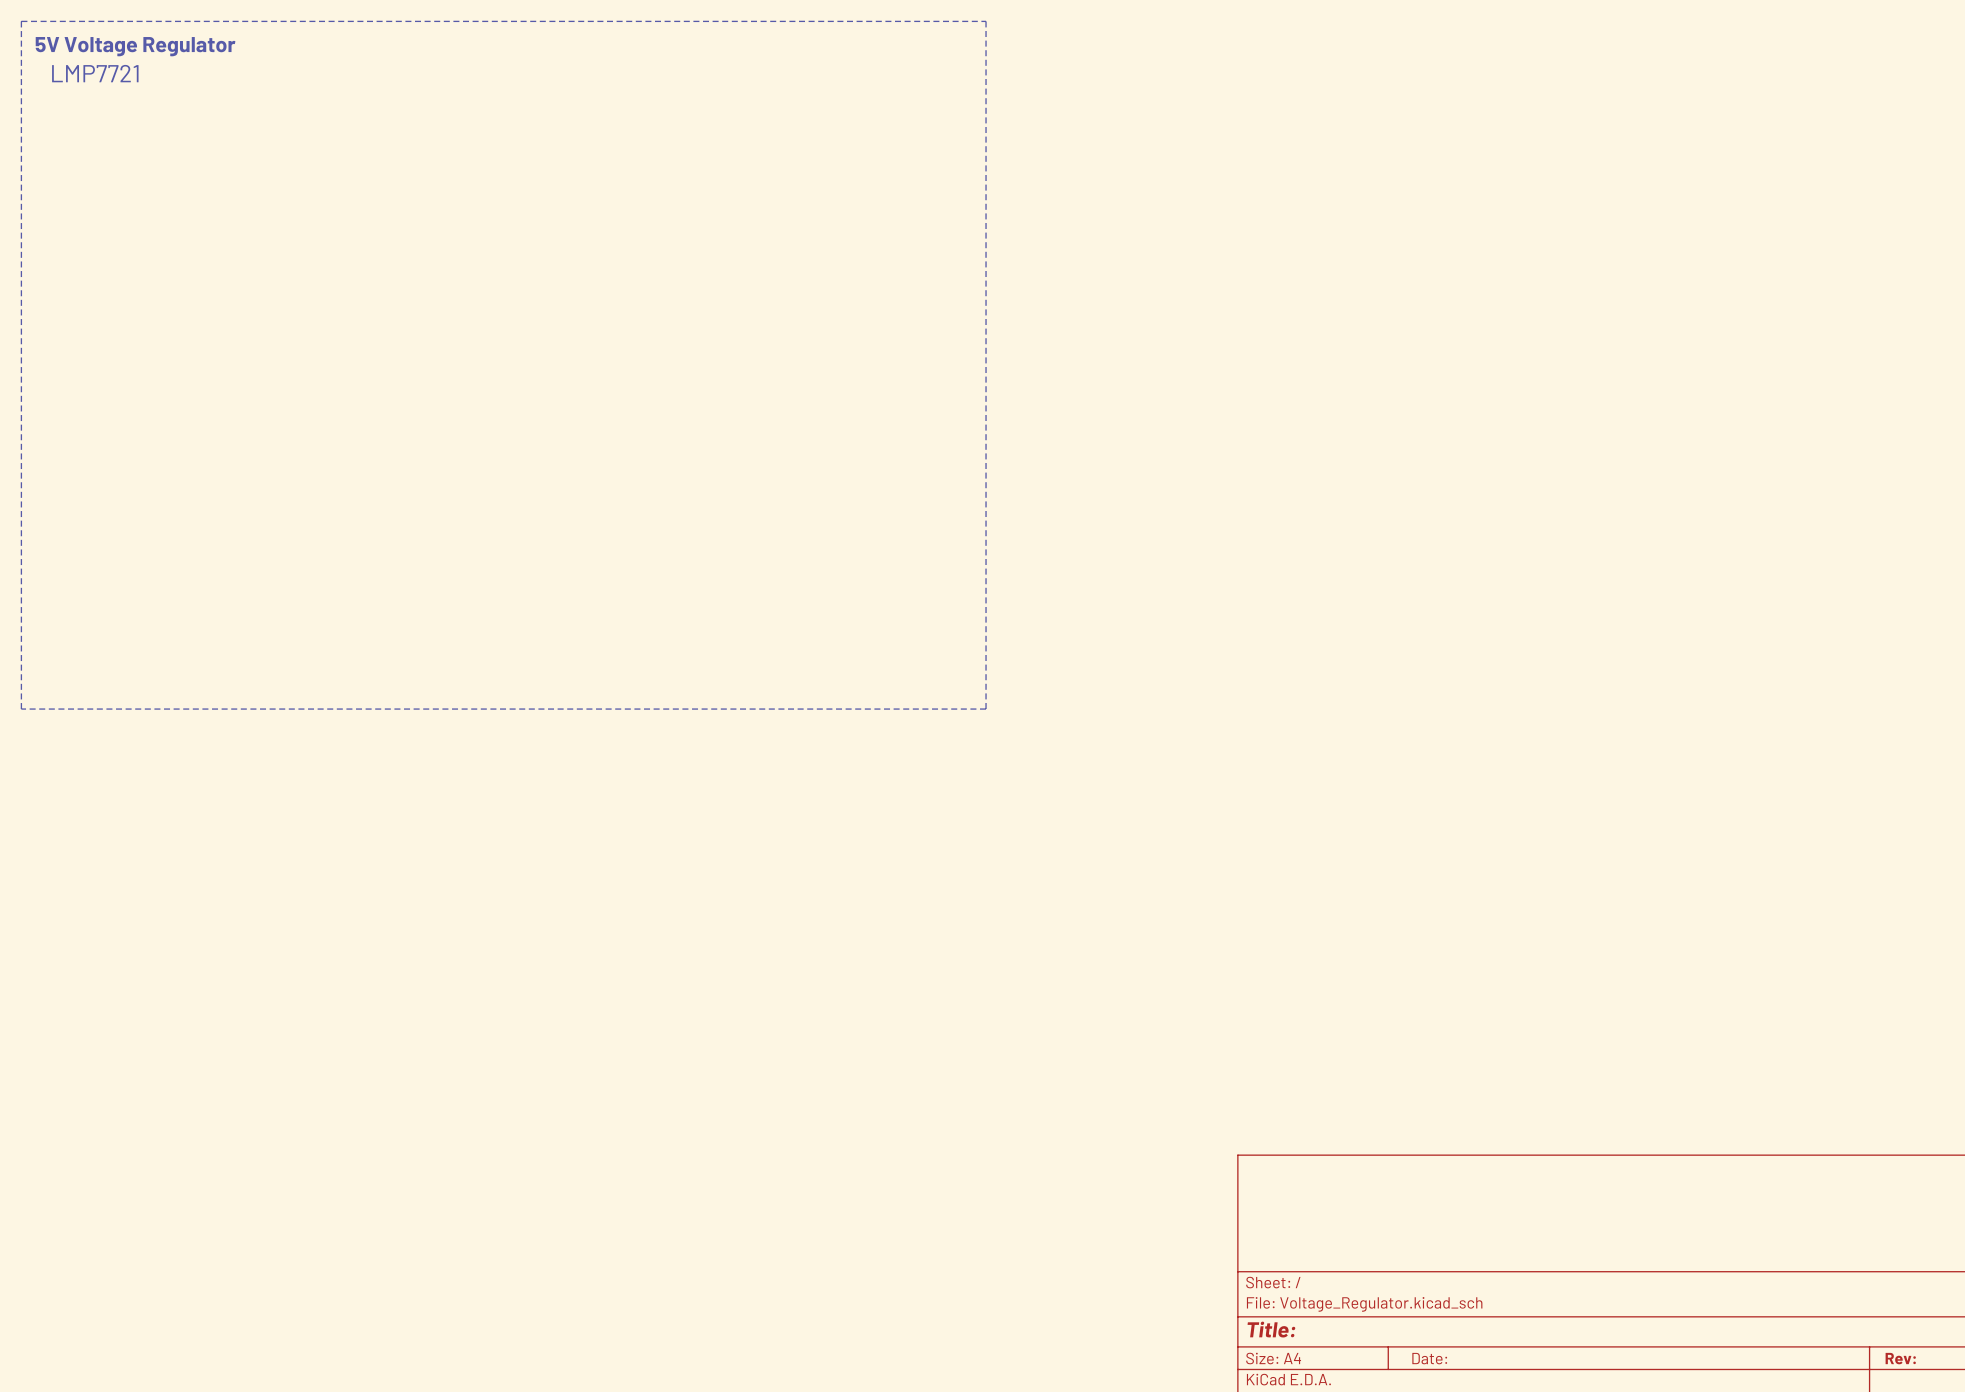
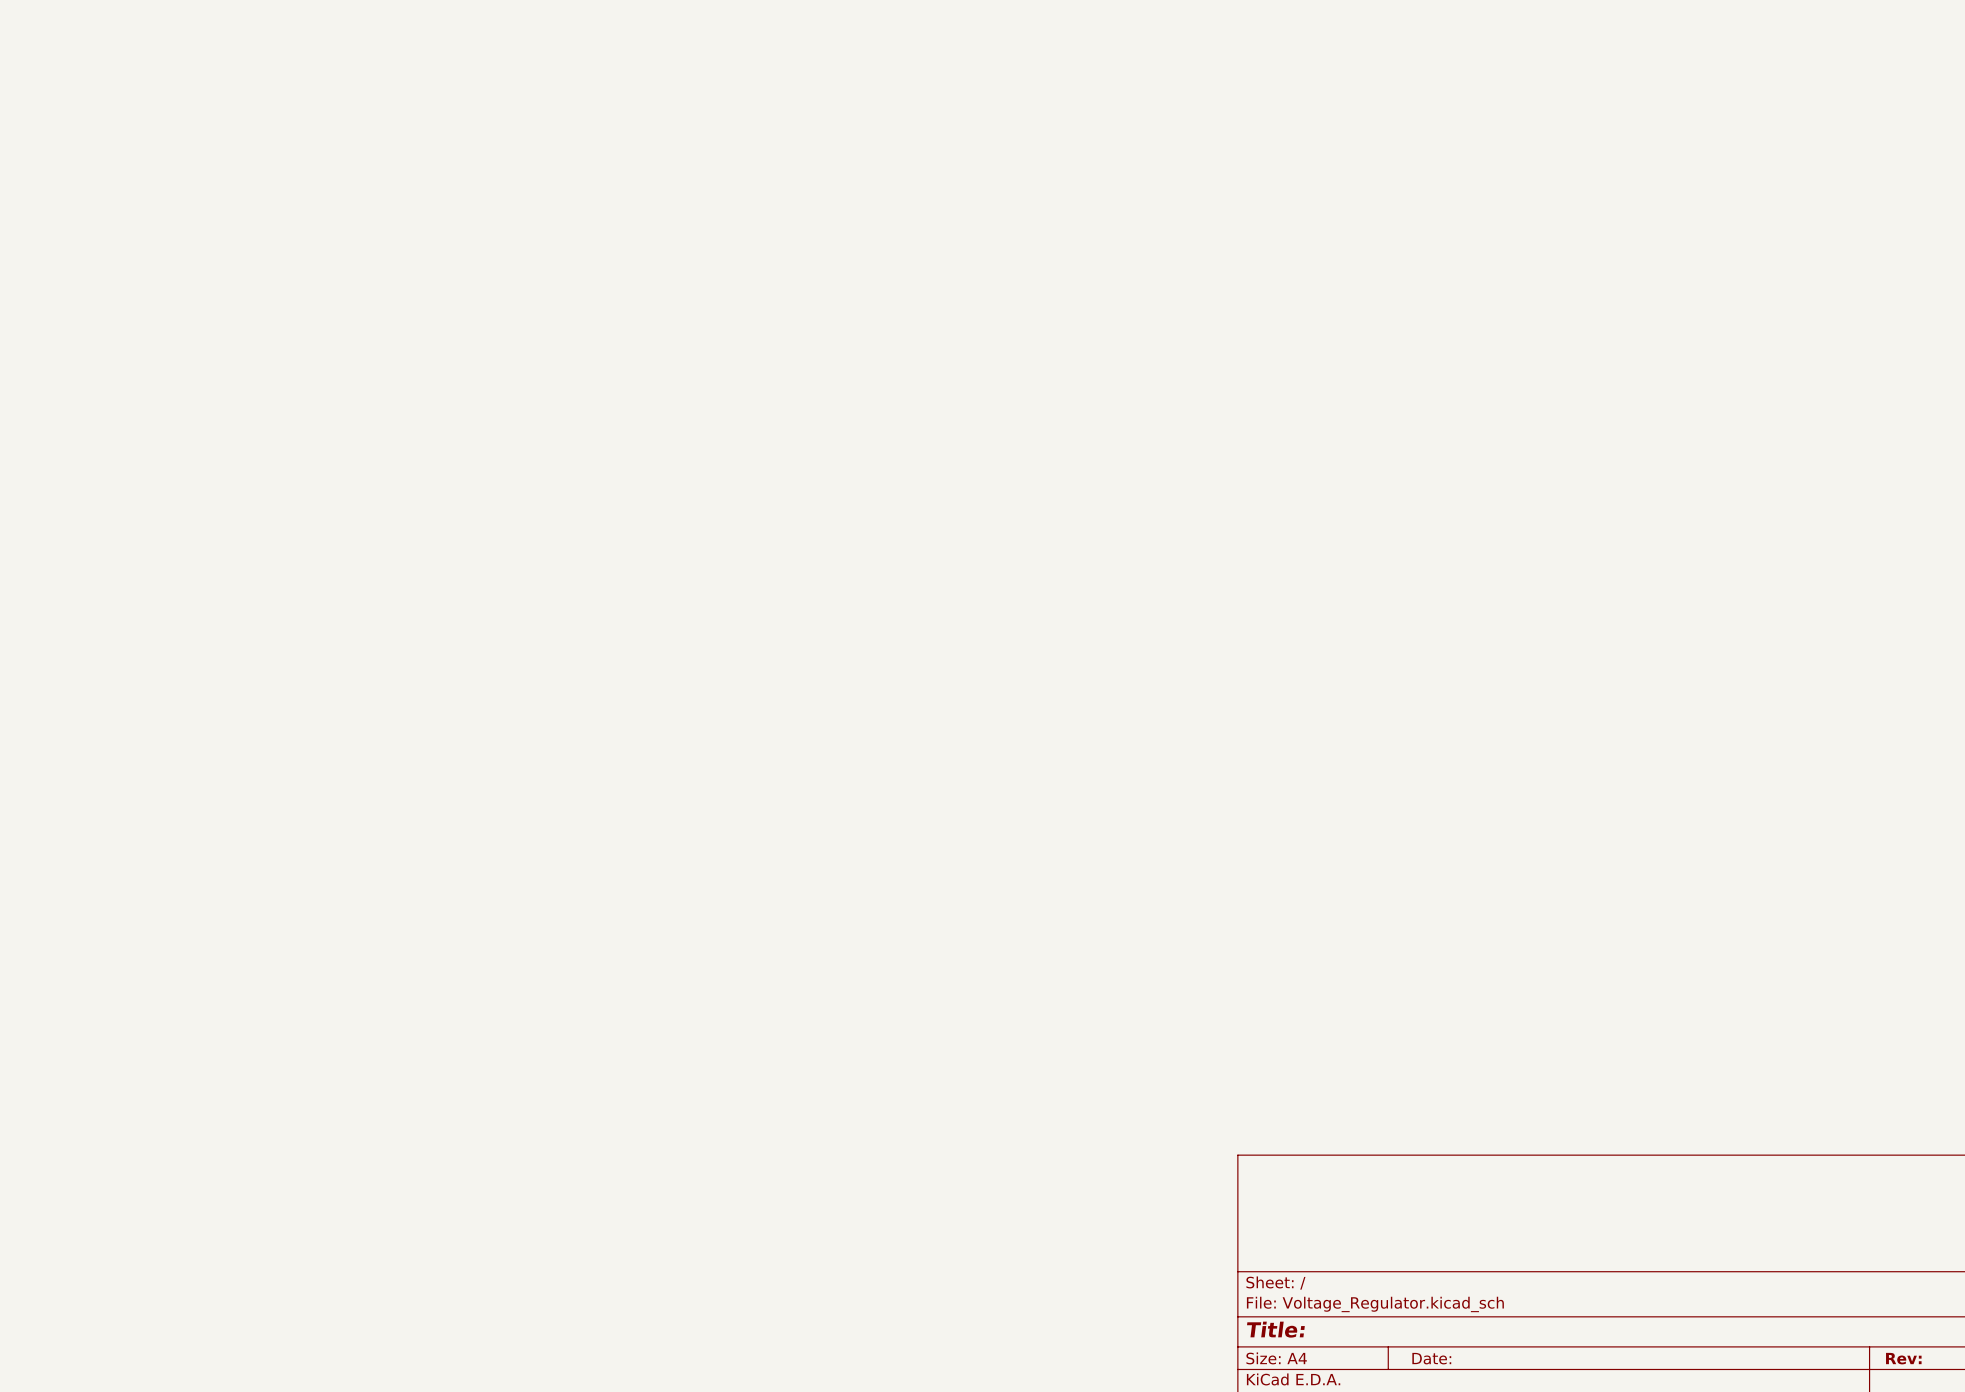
line: (21, 21) (986, 21) (986, 709) (21, 709) (21, 21) -> none
text: 5V Voltage Regulator (135, 46) -> none
text: LMP7721 (95, 73) -> none

